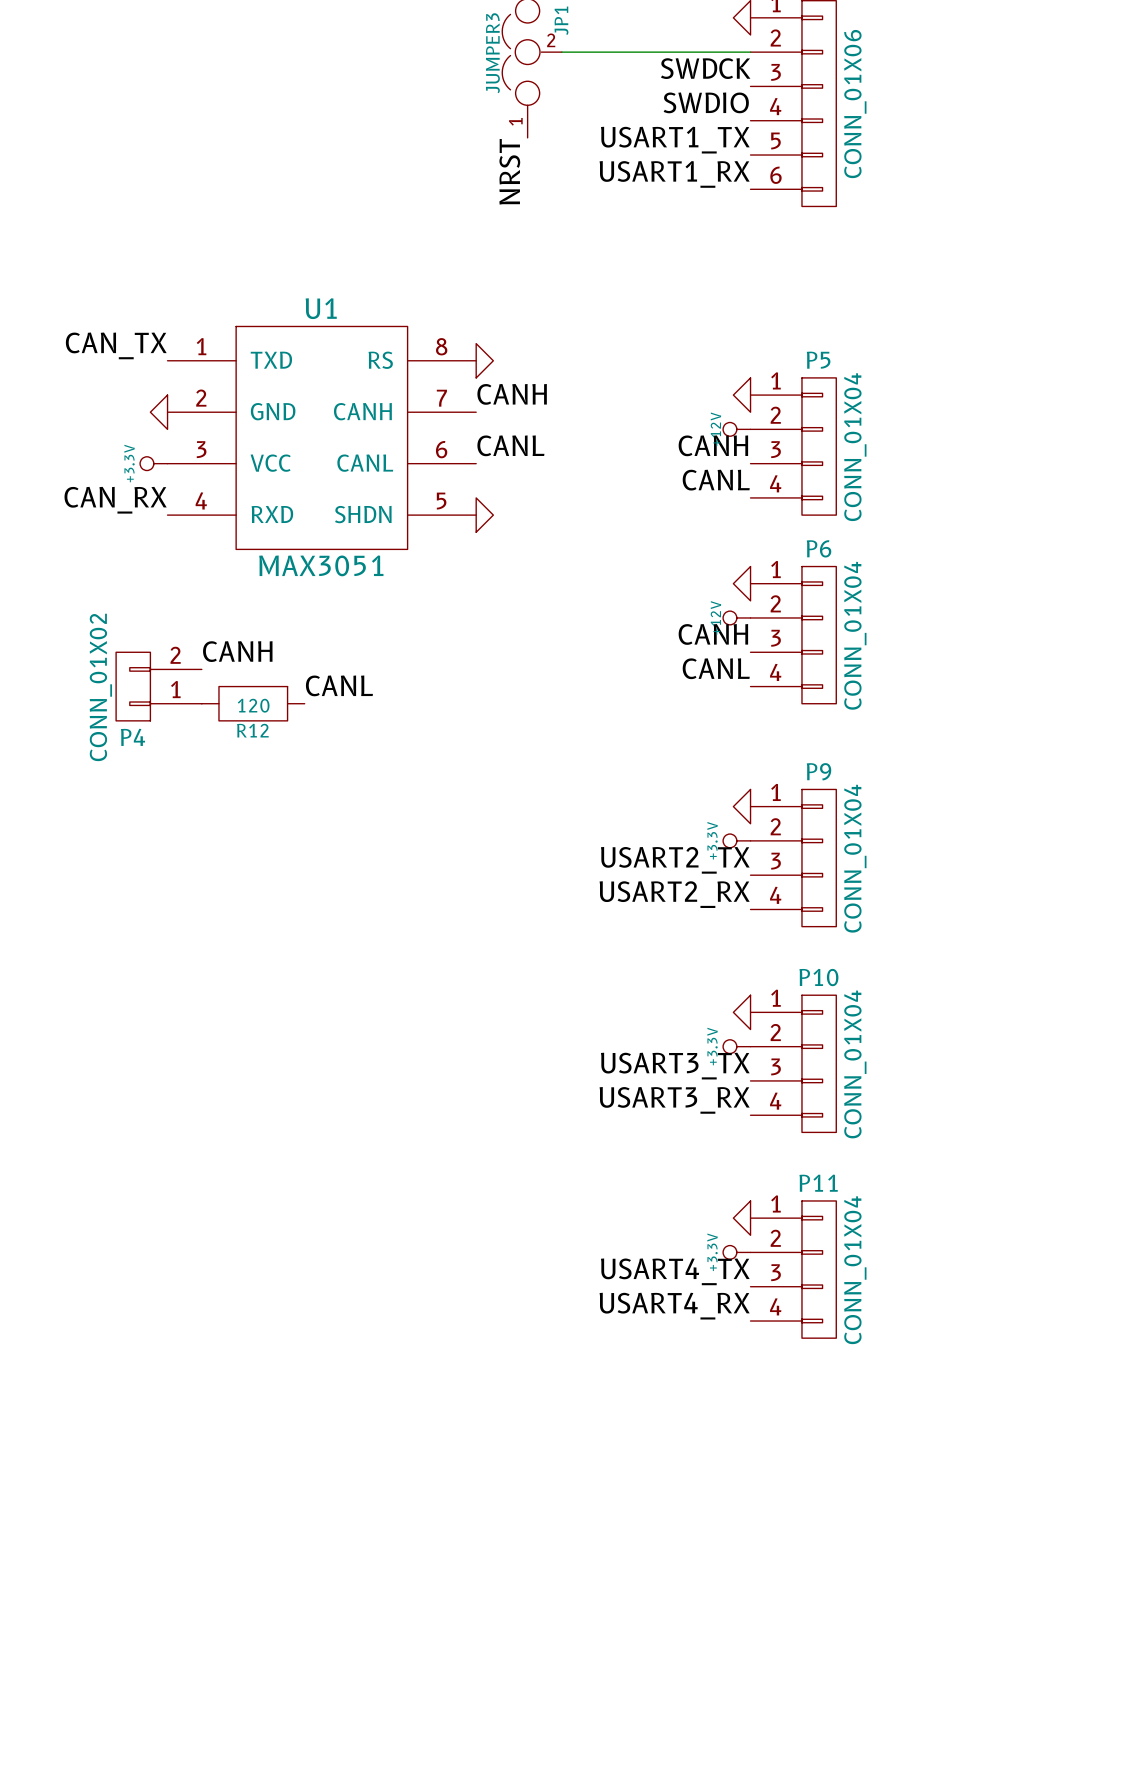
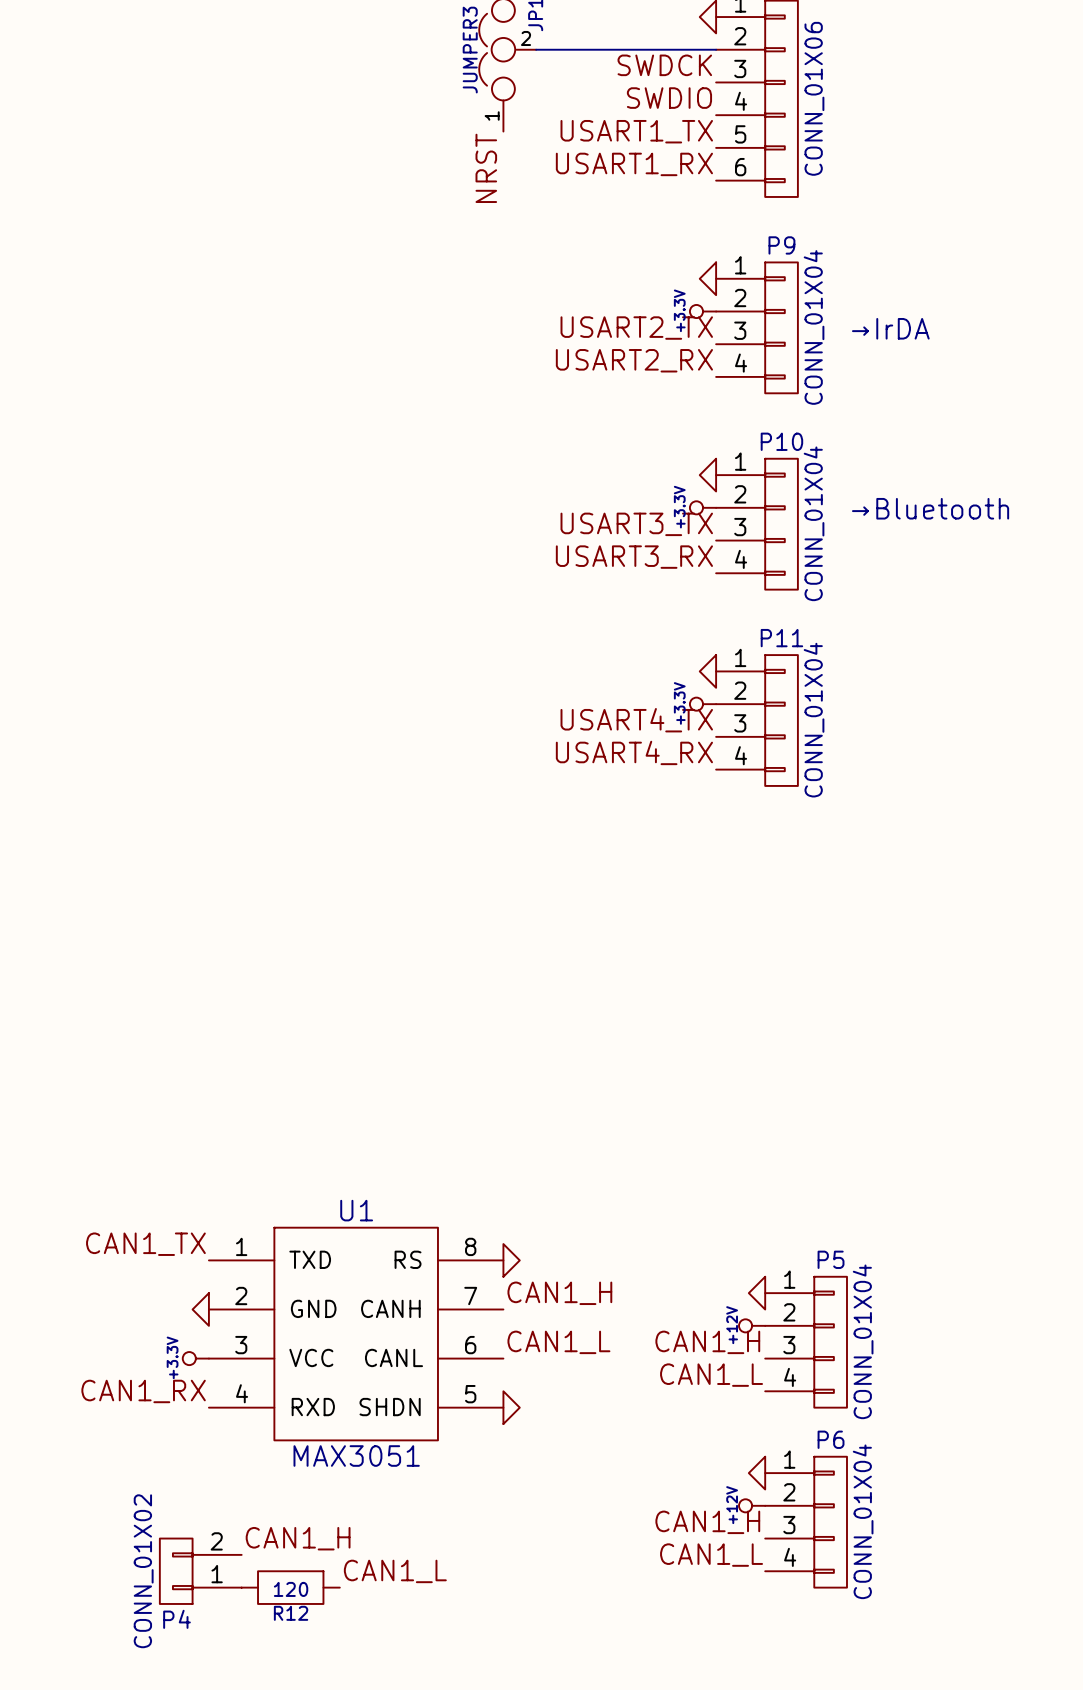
power symbol: none -> (707, 278)
power symbol: none -> +3.3V (703, 311)
text: none -> →IrDA (890, 328)
label: CAN_TX (116, 345) -> none
label: none -> USART2_TX (636, 328)
power symbol: (484, 360) -> none
label: none -> USART2_RX (634, 360)
label: CANH (512, 394) -> none
power symbol: (741, 395) -> none
power symbol: (158, 412) -> none
power symbol: +12V (736, 429) -> none
U1 position: (321, 437) -> (356, 1334)
label: CANL (510, 445) -> none
label: CANH (713, 445) -> none
P5 position: (793, 446) -> (806, 1342)
power symbol: +3.3V (153, 463) -> none
label: CANL (716, 480) -> none
power symbol: none -> (707, 475)
label: CAN_RX (115, 500) -> none
power symbol: (484, 515) -> none
power symbol: none -> +3.3V (703, 507)
text: none -> →Bluetooth (930, 508)
label: none -> USART3_TX (636, 524)
power symbol: (741, 583) -> none
label: none -> USART3_RX (634, 557)
power symbol: +12V (736, 617) -> none
label: CANH (713, 634) -> none
P6 position: (793, 635) -> (806, 1522)
label: CANH (237, 651) -> none
label: CANL (716, 668) -> none
label: CANL (339, 685) -> none
P4 position: (158, 686) -> (200, 1571)
R12 position: (253, 703) -> (290, 1587)
power symbol: none -> (707, 671)
label: none -> USART4_TX (636, 720)
label: none -> USART4_RX (634, 752)
power symbol: (741, 806) -> none
power symbol position: +3.3V (736, 840) -> +3.3V (703, 704)
P9 position: (793, 858) -> (757, 327)
label: USART2_TX (675, 860) -> none
label: USART2_RX (674, 894) -> none
power symbol: (741, 1012) -> none
power symbol: +3.3V (736, 1046) -> none
P10 position: (793, 1063) -> (757, 524)
label: USART3_TX (675, 1066) -> none
label: USART3_RX (674, 1100) -> none
power symbol: (741, 1218) -> none
power symbol: +3.3V (736, 1252) -> none
P11 position: (793, 1269) -> (757, 720)
label: USART4_TX (675, 1271) -> none
label: none -> CAN1_TX (145, 1244)
label: USART4_RX (674, 1306) -> none
power symbol: none -> (511, 1260)
power symbol: none -> (757, 1293)
label: none -> CAN1_H (559, 1293)
power symbol: none -> (200, 1309)
power symbol: none -> +12V (752, 1325)
label: none -> CAN1_L (558, 1342)
label: none -> CAN1_H (707, 1342)
power symbol: none -> +3.3V (195, 1358)
label: none -> CAN1_L (711, 1375)
label: none -> CAN1_RX (143, 1391)
power symbol: none -> (511, 1407)
power symbol: none -> (757, 1473)
power symbol: none -> +12V (752, 1505)
label: none -> CAN1_H (707, 1522)
label: none -> CAN1_H (298, 1538)
label: none -> CAN1_L (711, 1555)
label: none -> CAN1_L (395, 1571)

